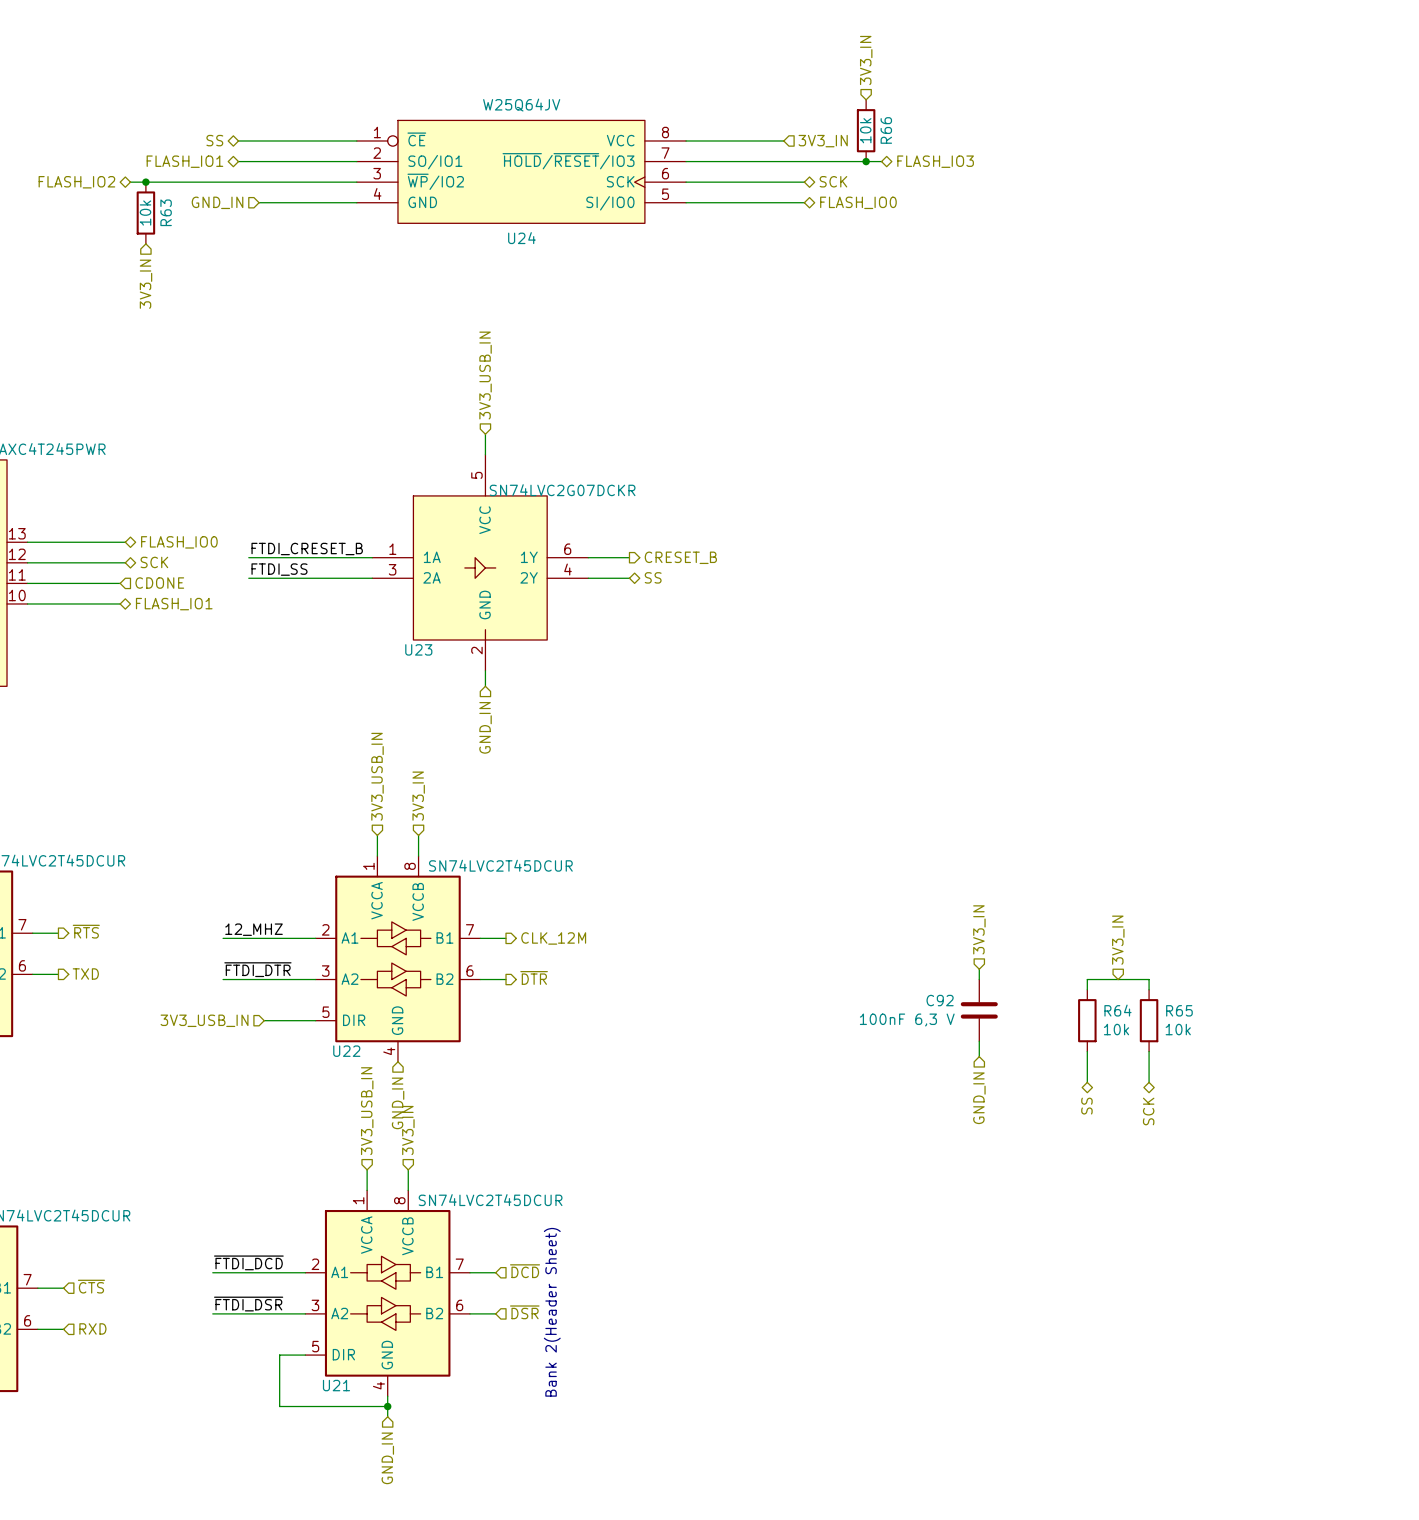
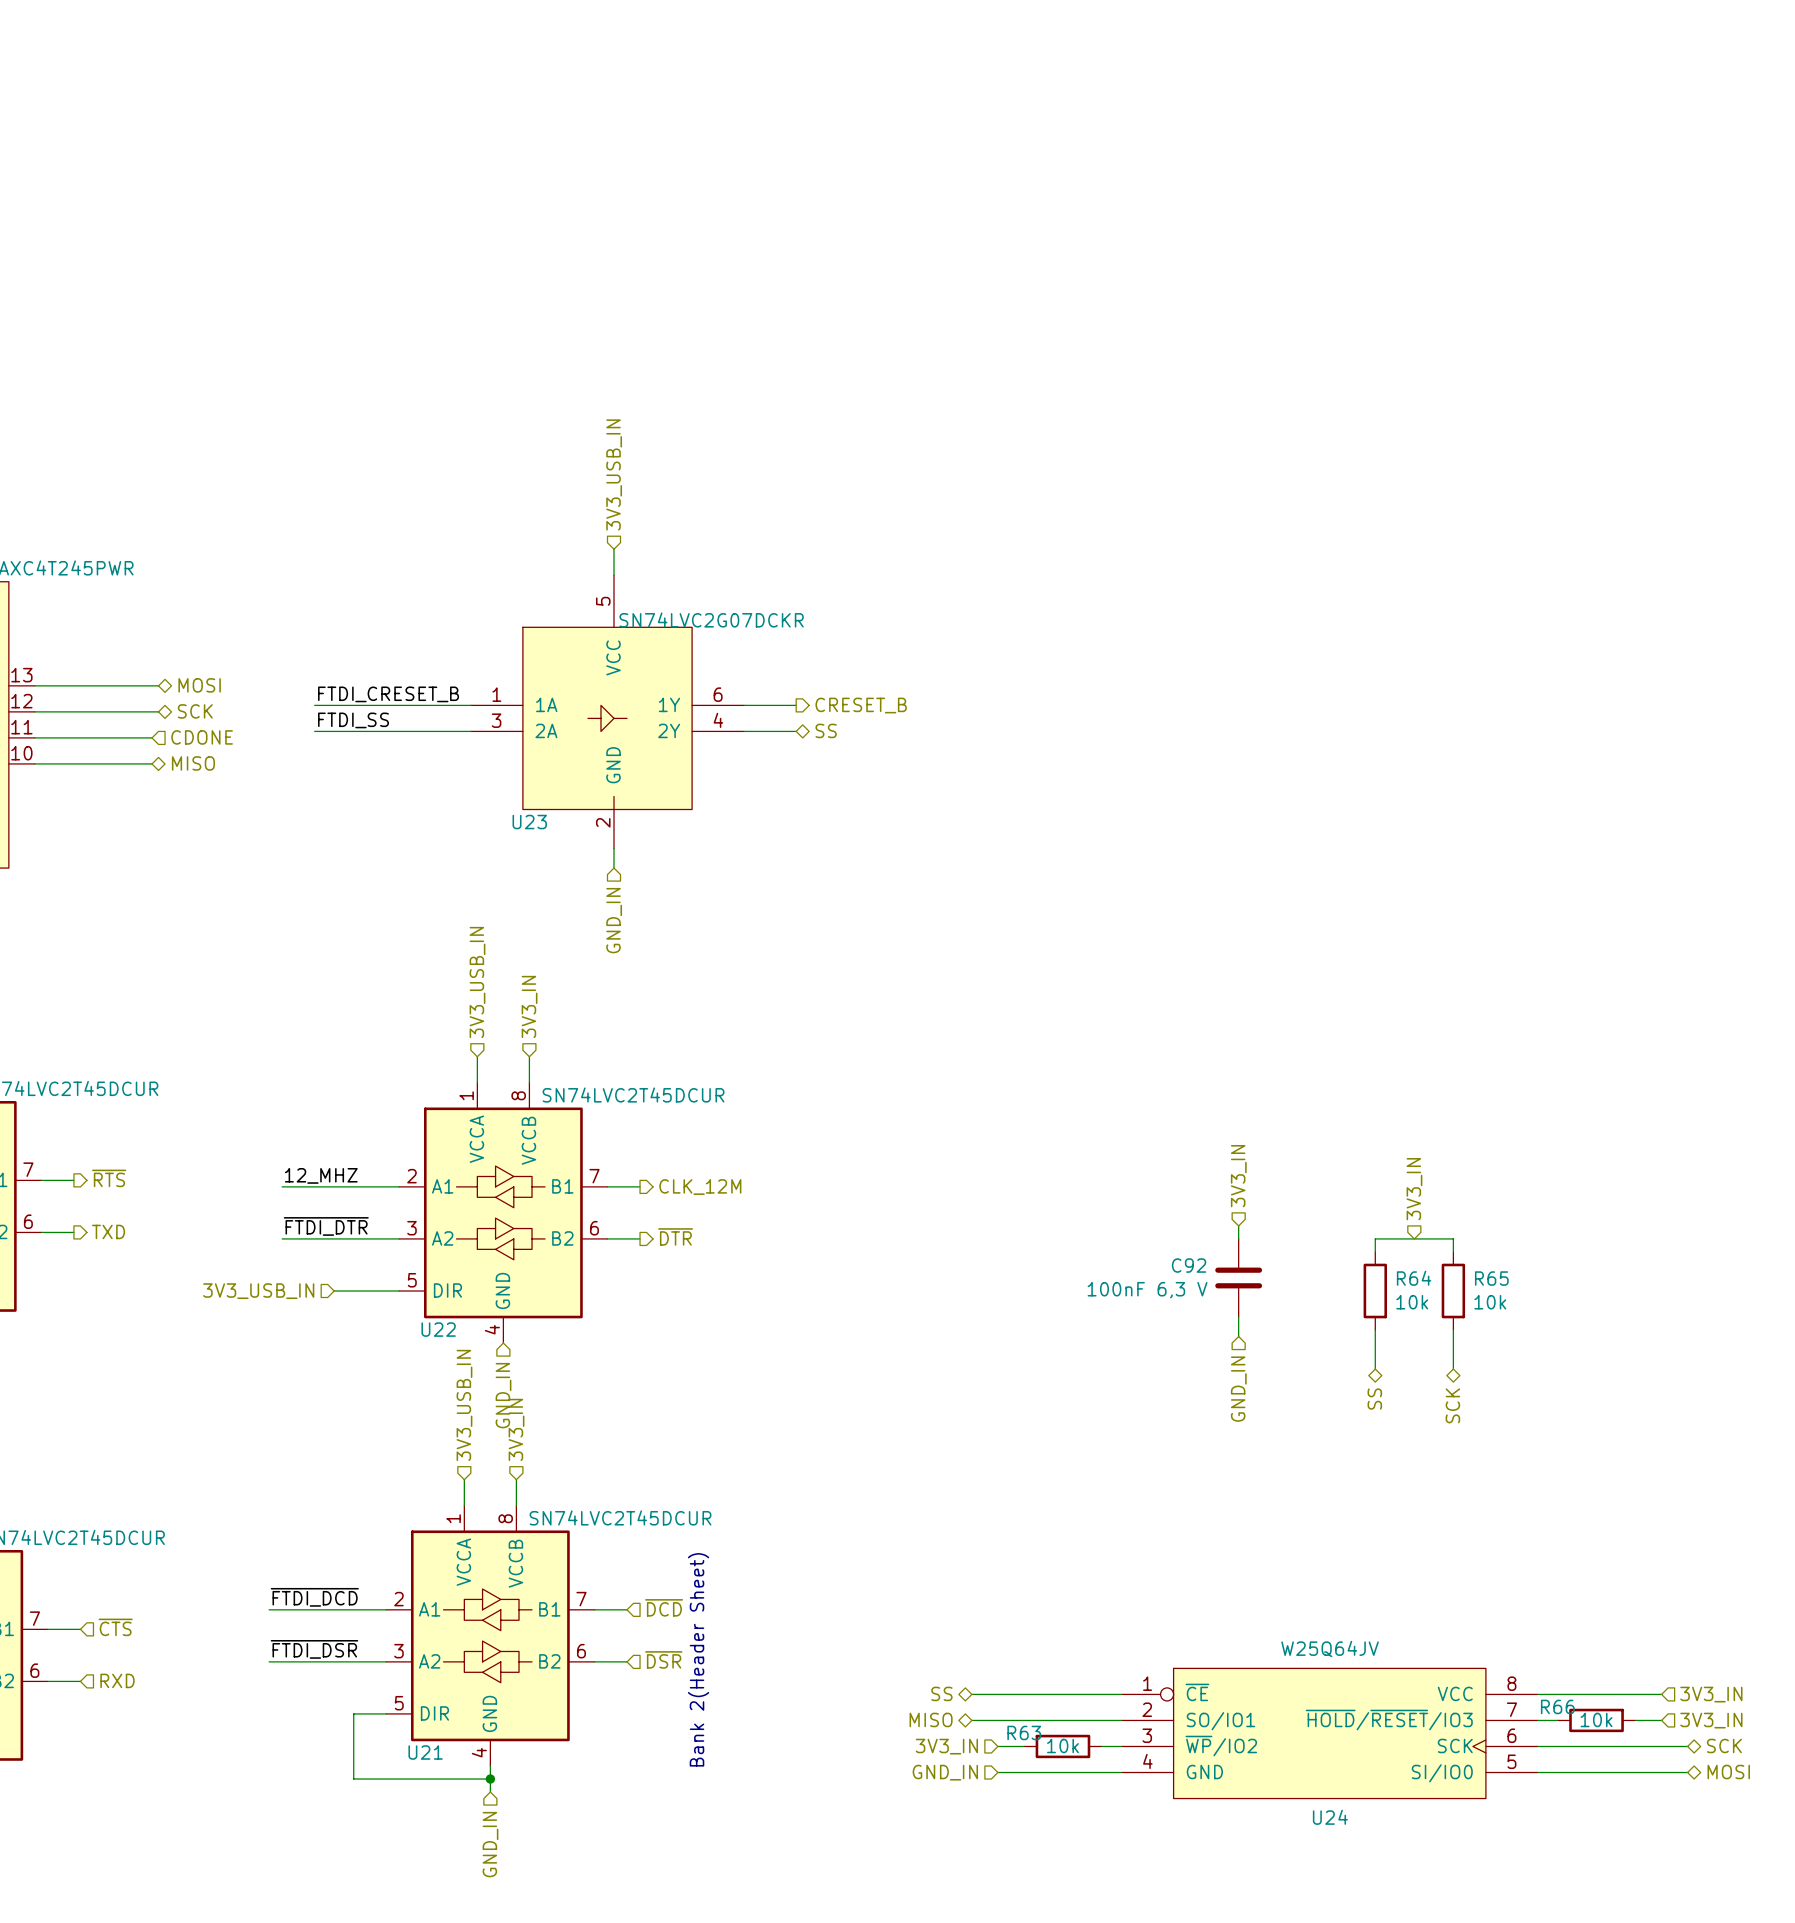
hierarchical label: 3V3_IN (866, 60) -> none
R66 rotation: 0° (866, 130) -> 90° clockwise (1596, 1720)
R66 position: (866, 130) -> (1596, 1720)
R66 name position: R66 (886, 130) -> R66 (1557, 1706)
hierarchical label: SS (214, 140) -> none
wire: (238, 140) (356, 140) -> none
wire: (686, 140) (783, 140) -> none
hierarchical label: 3V3_IN (823, 141) -> none
hierarchical label: FLASH_IO1 (184, 161) -> none
wire: (238, 161) (356, 161) -> none
wire: (686, 161) (881, 161) -> none
junction: (866, 161) -> none
hierarchical label: FLASH_IO3 (935, 161) -> none
U24 position: (521, 171) -> (1329, 1733)
hierarchical label: SCK (833, 181) -> none
hierarchical label: FLASH_IO2 (76, 182) -> none
wire: (130, 182) (356, 182) -> none
junction: (145, 182) -> none
wire: (686, 182) (804, 182) -> none
hierarchical label: GND_IN (217, 202) -> none
wire: (259, 202) (356, 202) -> none
wire: (686, 202) (804, 202) -> none
hierarchical label: FLASH_IO0 (858, 202) -> none
R63 name position: R63 (166, 212) -> R63 (1024, 1732)
R63 rotation: 0° (145, 213) -> 90° clockwise (1062, 1746)
R63 position: (145, 213) -> (1062, 1746)
hierarchical label: 3V3_IN (146, 284) -> none
hierarchical label: FLASH_IO0 (179, 542) -> MOSI (199, 685)
hierarchical label: FLASH_IO1 (174, 604) -> MISO (193, 763)
hierarchical label: none -> SS (941, 1693)
wire: none -> (971, 1694) (1121, 1694)
wire: none -> (1537, 1694) (1661, 1694)
hierarchical label: none -> 3V3_IN (1711, 1694)
hierarchical label: none -> MISO (931, 1719)
wire: none -> (971, 1720) (1121, 1720)
wire: none -> (1537, 1720) (1557, 1720)
wire: none -> (1635, 1720) (1661, 1720)
hierarchical label: none -> 3V3_IN (1711, 1720)
hierarchical label: none -> 3V3_IN (946, 1746)
wire: none -> (997, 1746) (1023, 1746)
wire: none -> (1102, 1746) (1121, 1746)
wire: none -> (1537, 1746) (1687, 1746)
hierarchical label: none -> SCK (1724, 1745)
hierarchical label: none -> MOSI (1728, 1772)
hierarchical label: none -> GND_IN (945, 1772)
wire: none -> (997, 1772) (1121, 1772)
wire: none -> (1537, 1772) (1687, 1772)

